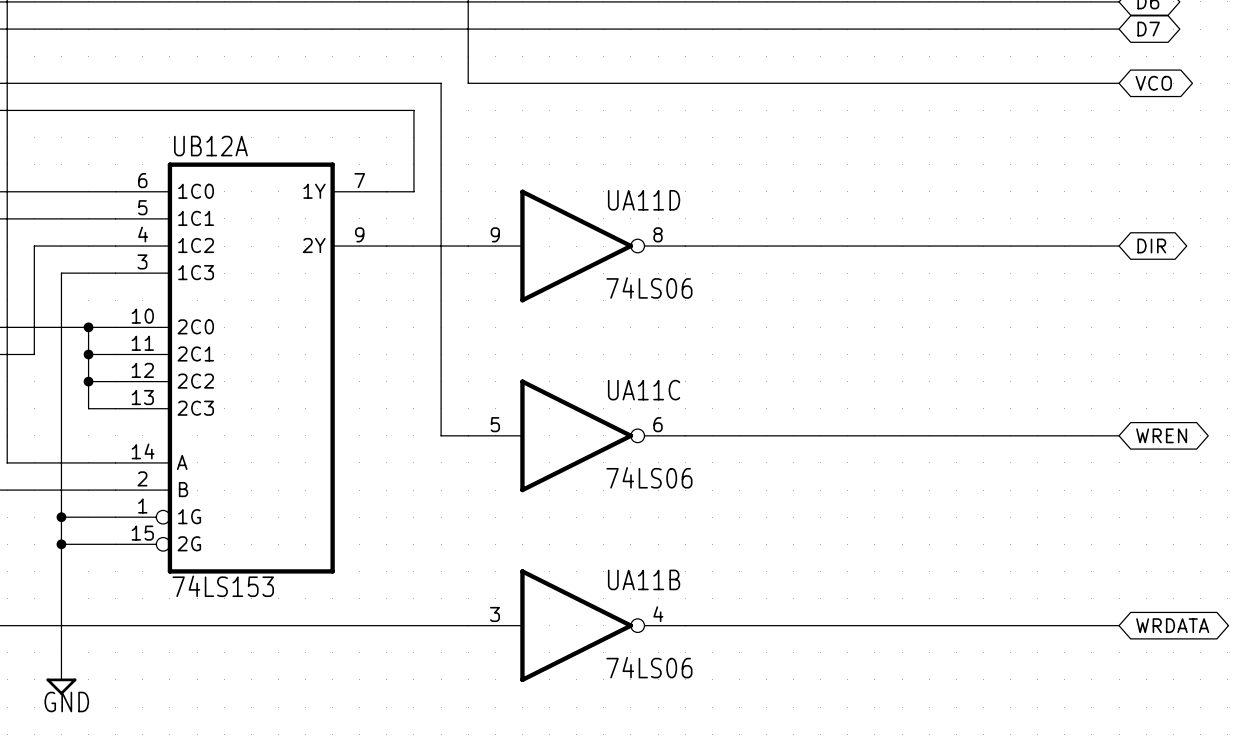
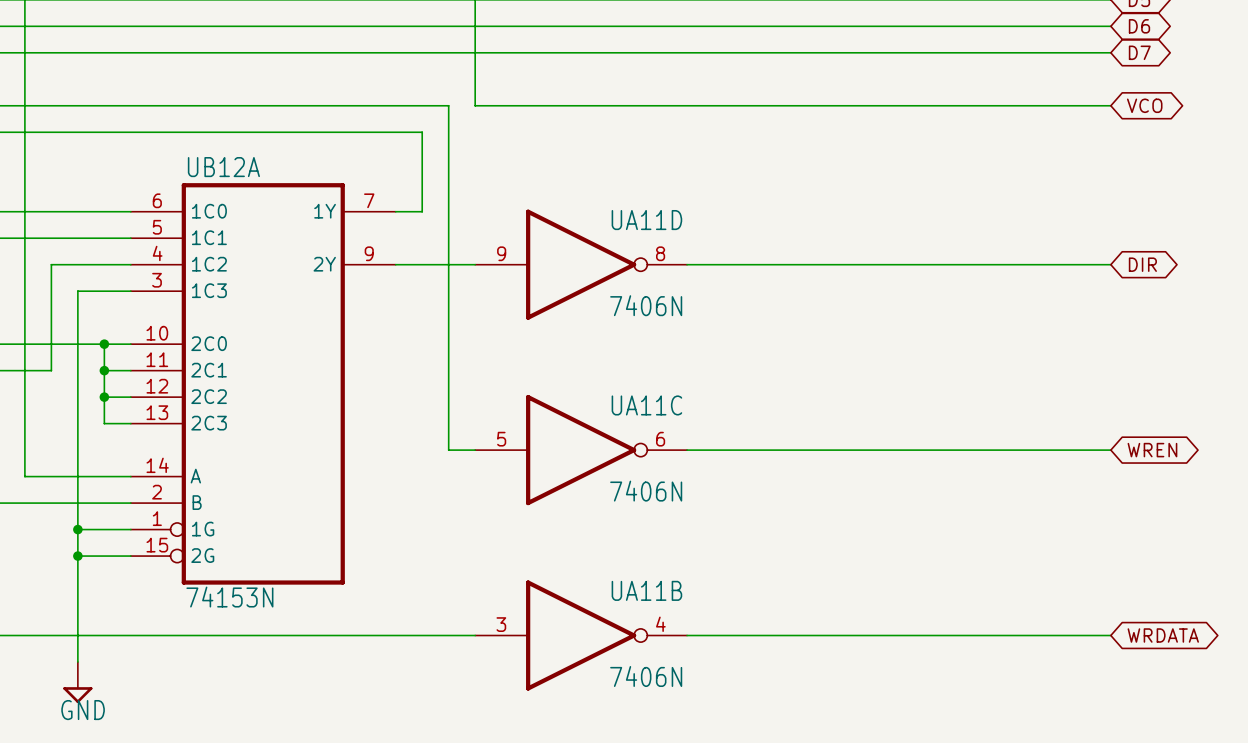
UA11D value: 74LS06 (649, 287) -> 7406N (646, 305)
UA11C value: 74LS06 (649, 477) -> 7406N (646, 491)
UB12A value: 74LS153 (223, 586) -> 74153N (229, 597)
UA11B value: 74LS06 (649, 667) -> 7406N (646, 676)

